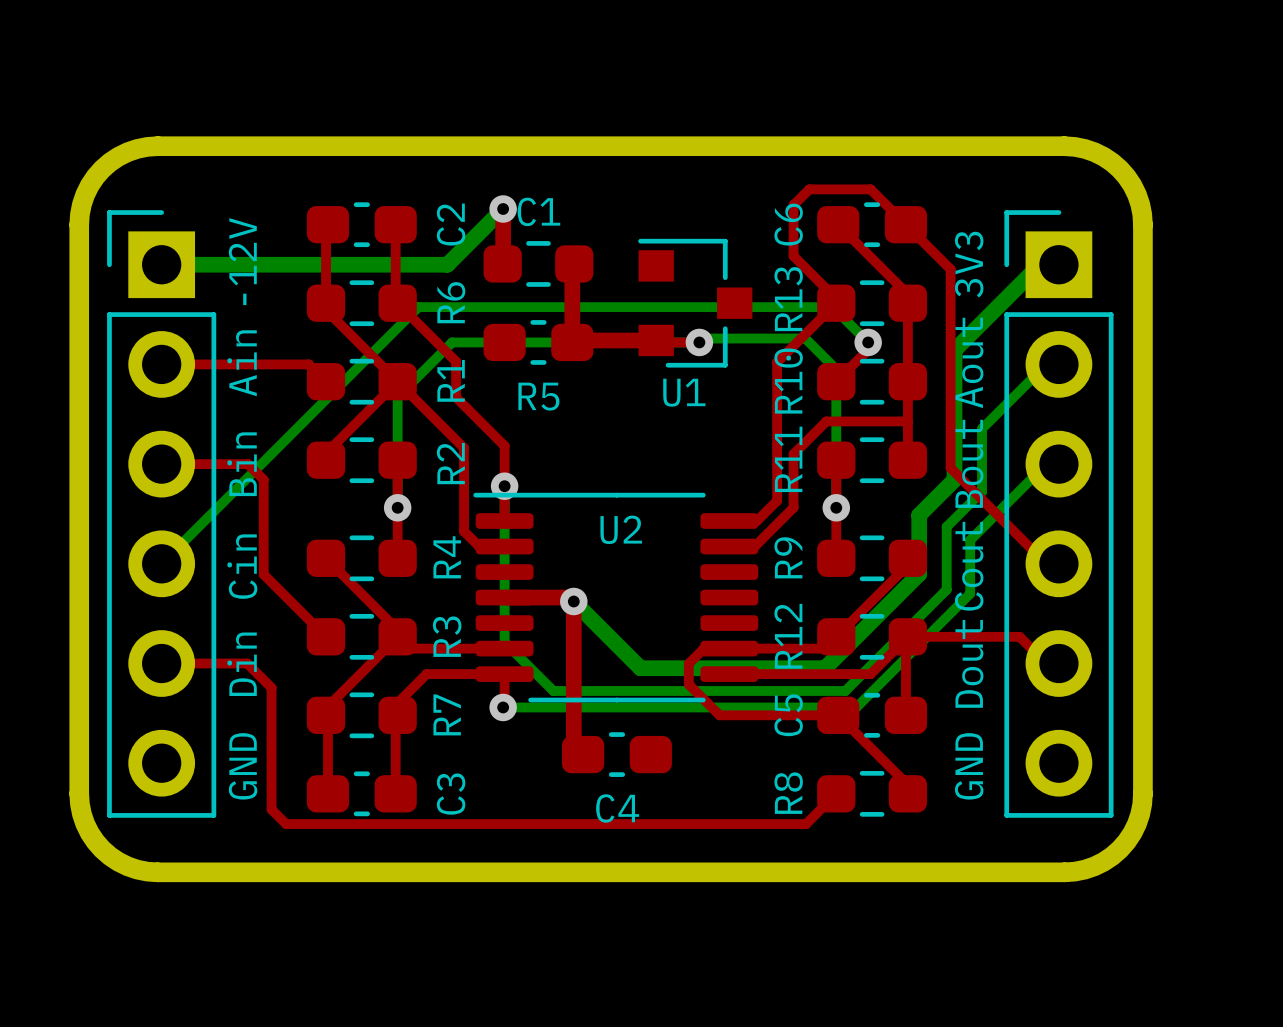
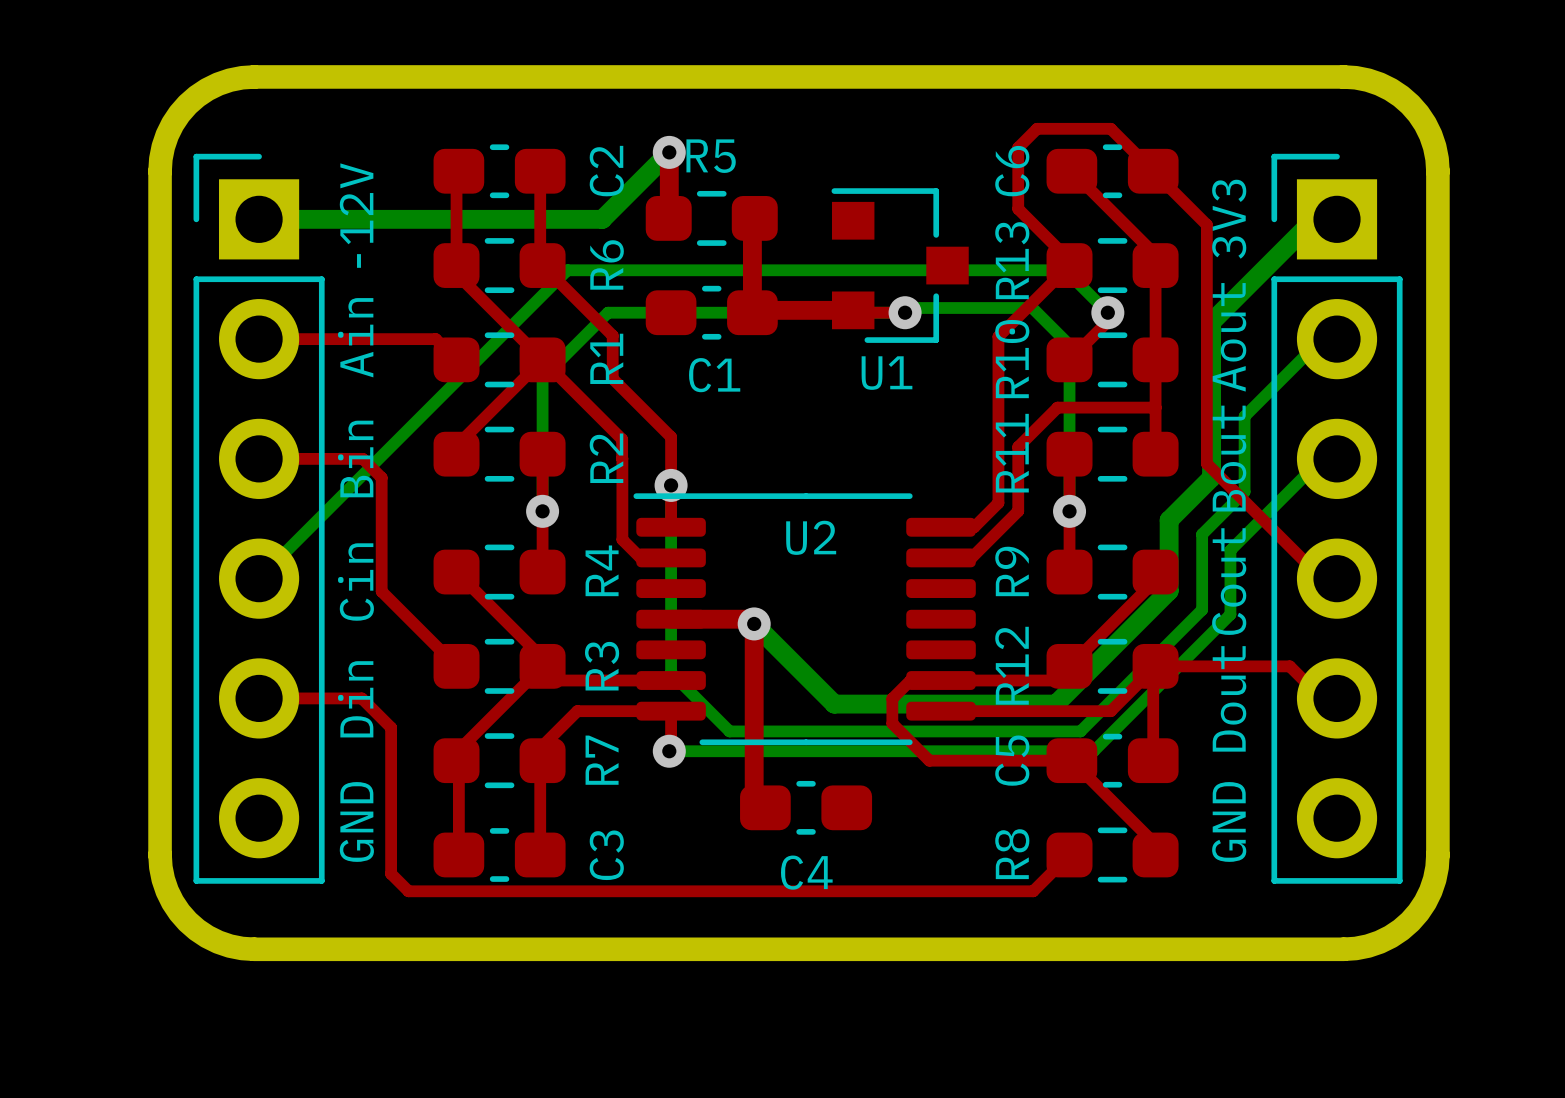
C1 name position: C1 (538, 211) -> C1 (714, 375)
R5 name position: R5 (538, 396) -> R5 (711, 156)

